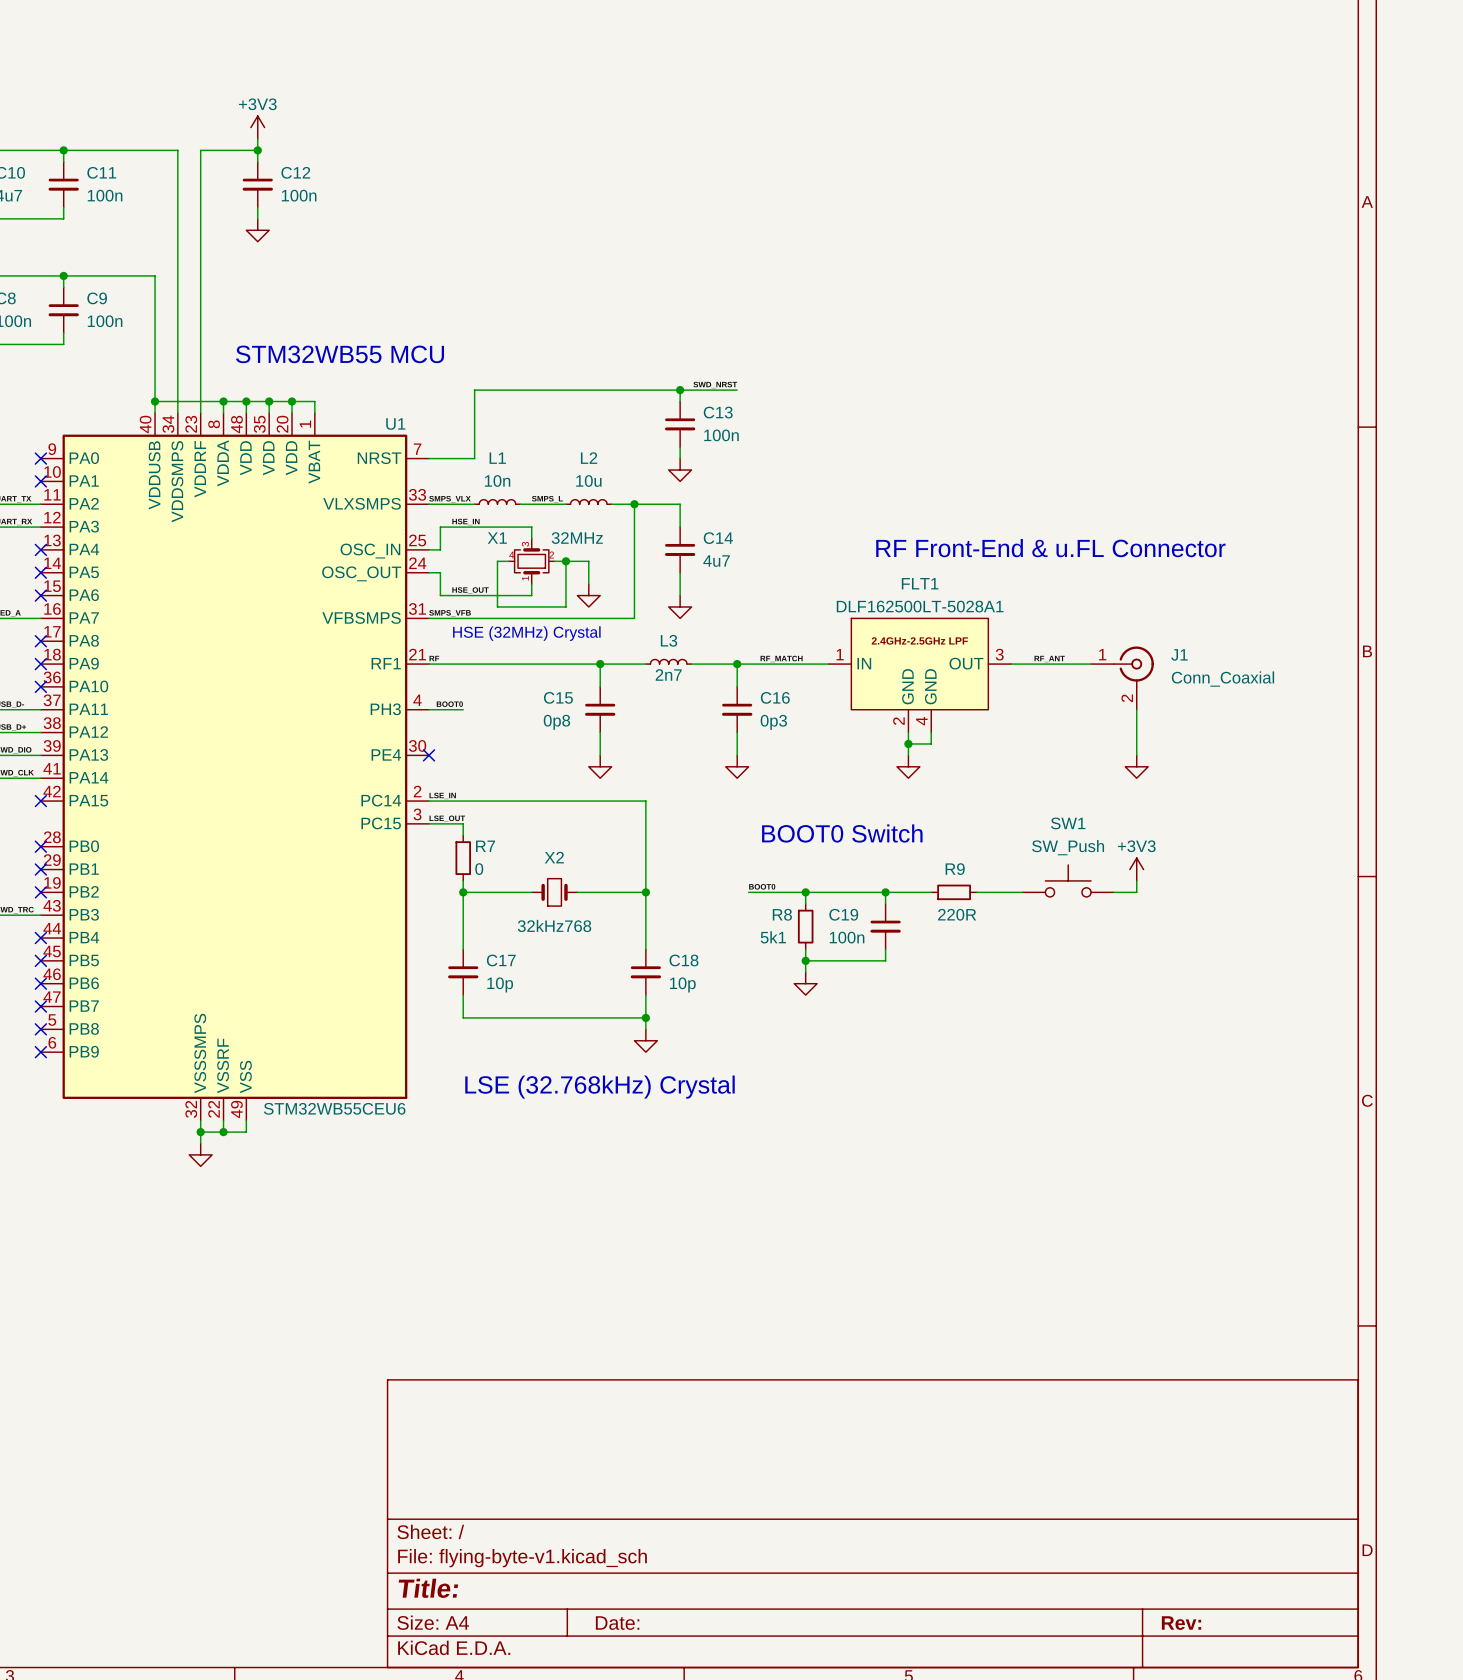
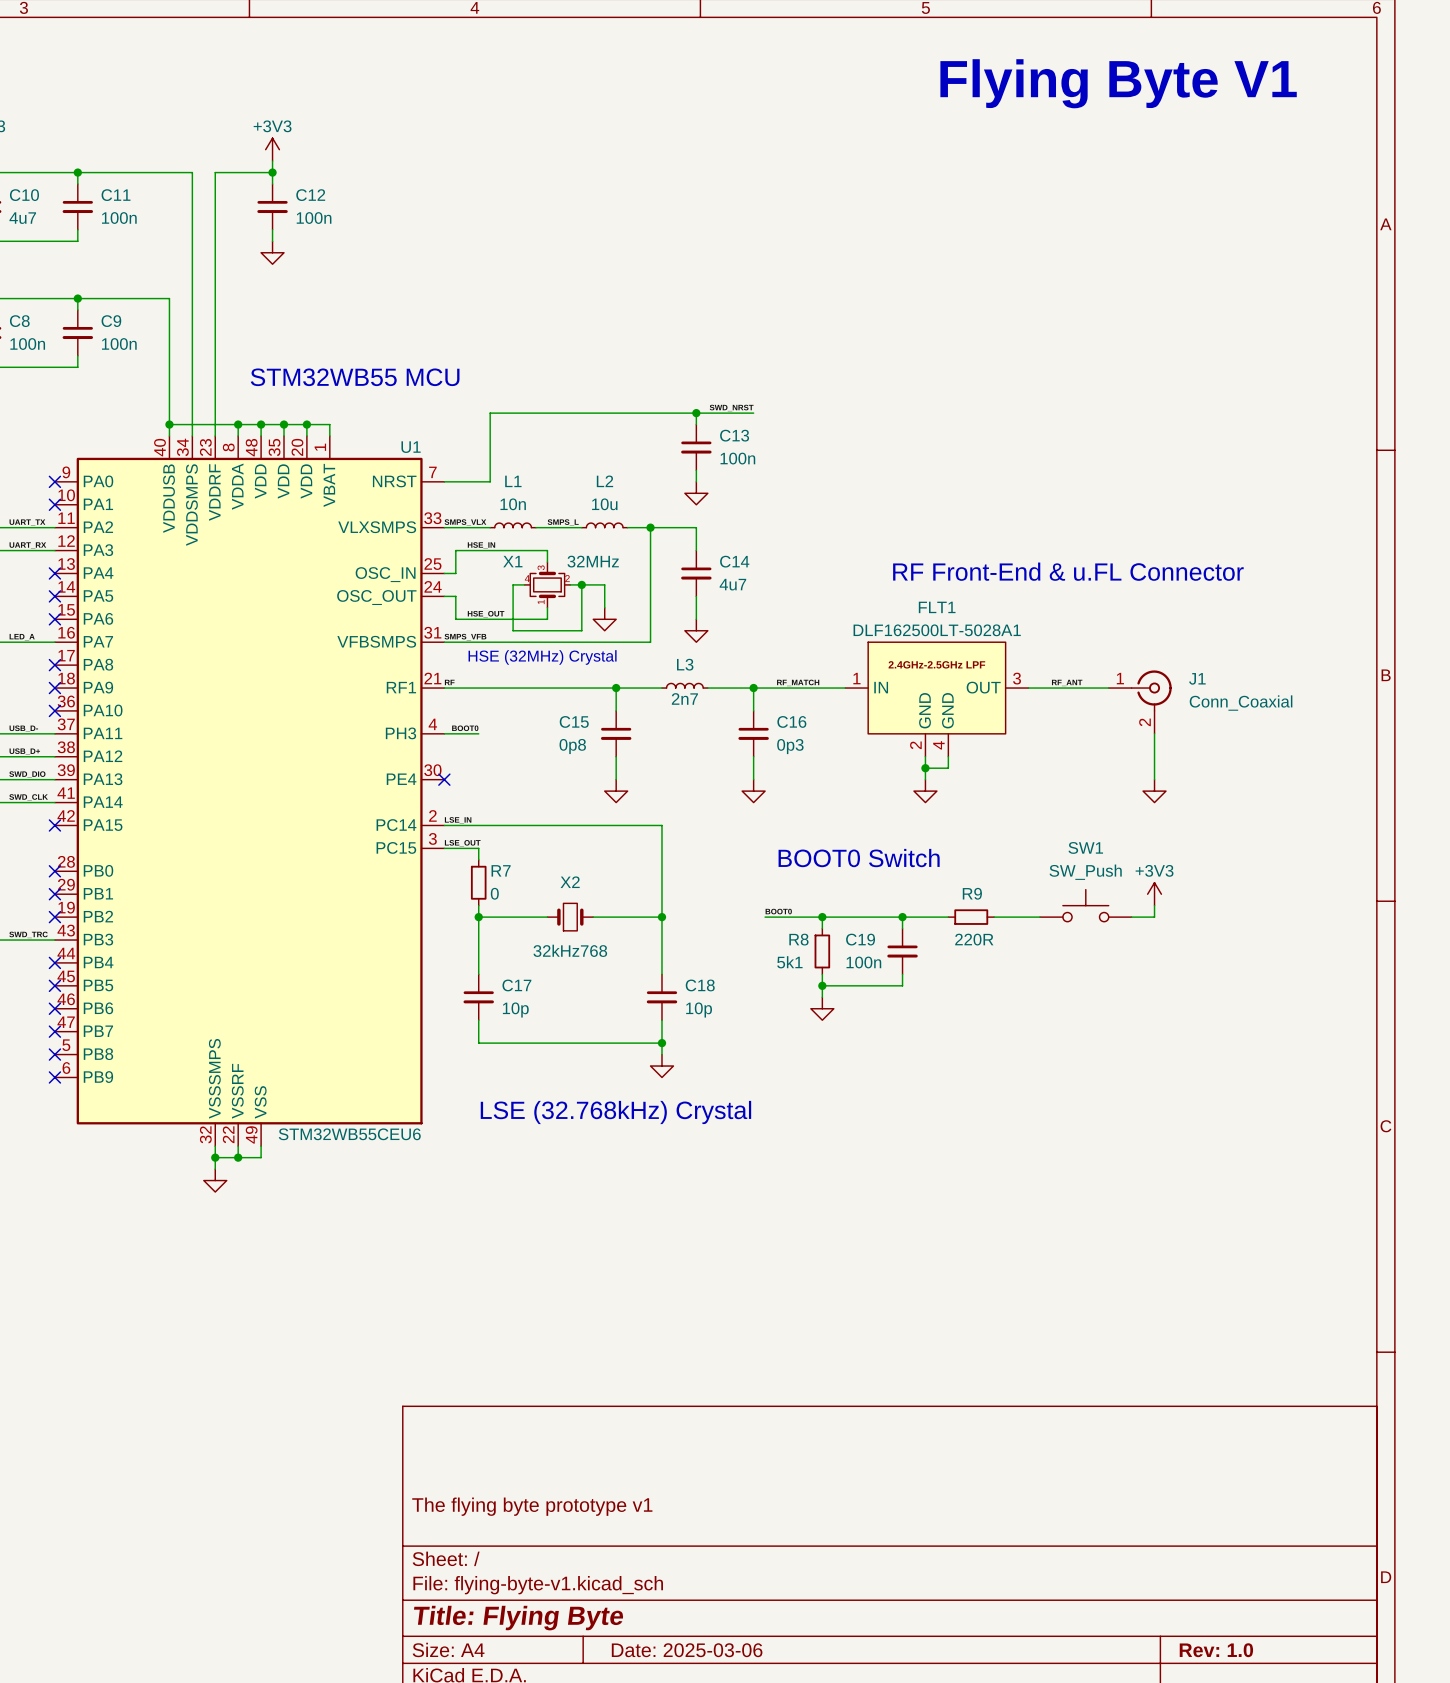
text: none -> Flying Byte V1 (1118, 83)
title block: none -> The flying byte prototype v1 (532, 1506)
title block: Title: (428, 1588) -> Title: Flying Byte (518, 1618)
title block: Date: (617, 1623) -> Date: 2025-03-06 (687, 1650)
title block: Rev: (1181, 1623) -> Rev: 1.0 (1216, 1650)

